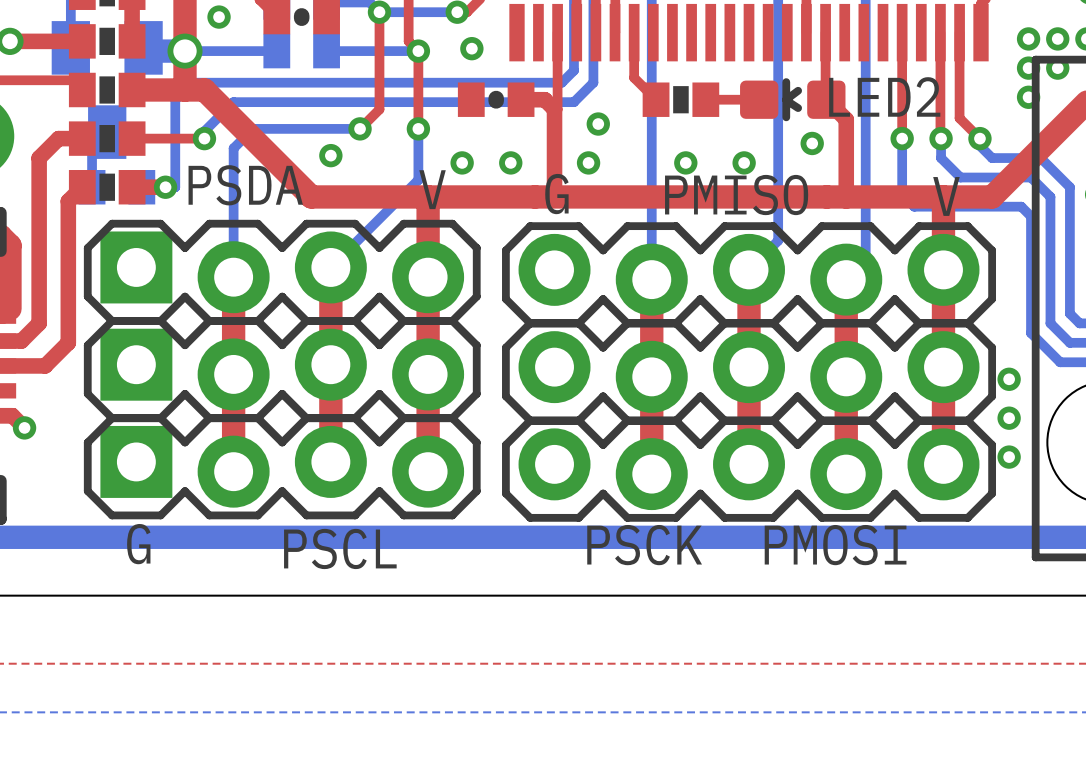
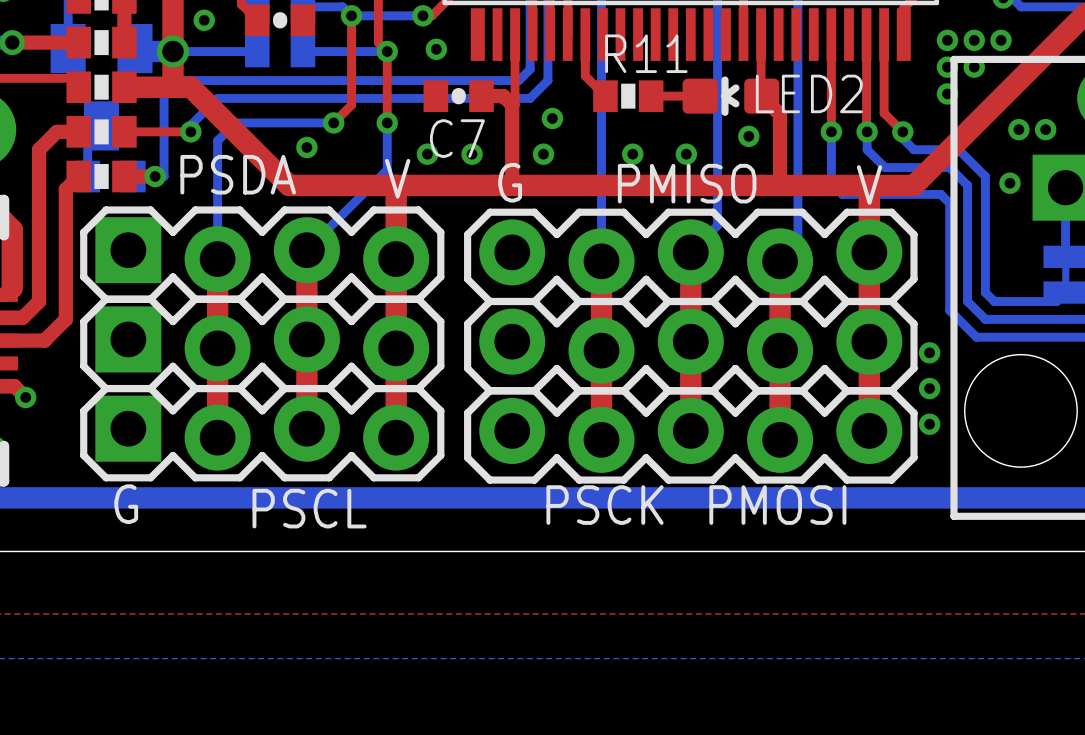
R11 name: none -> R11 (646, 53)
C7 name: none -> C7 (457, 138)

